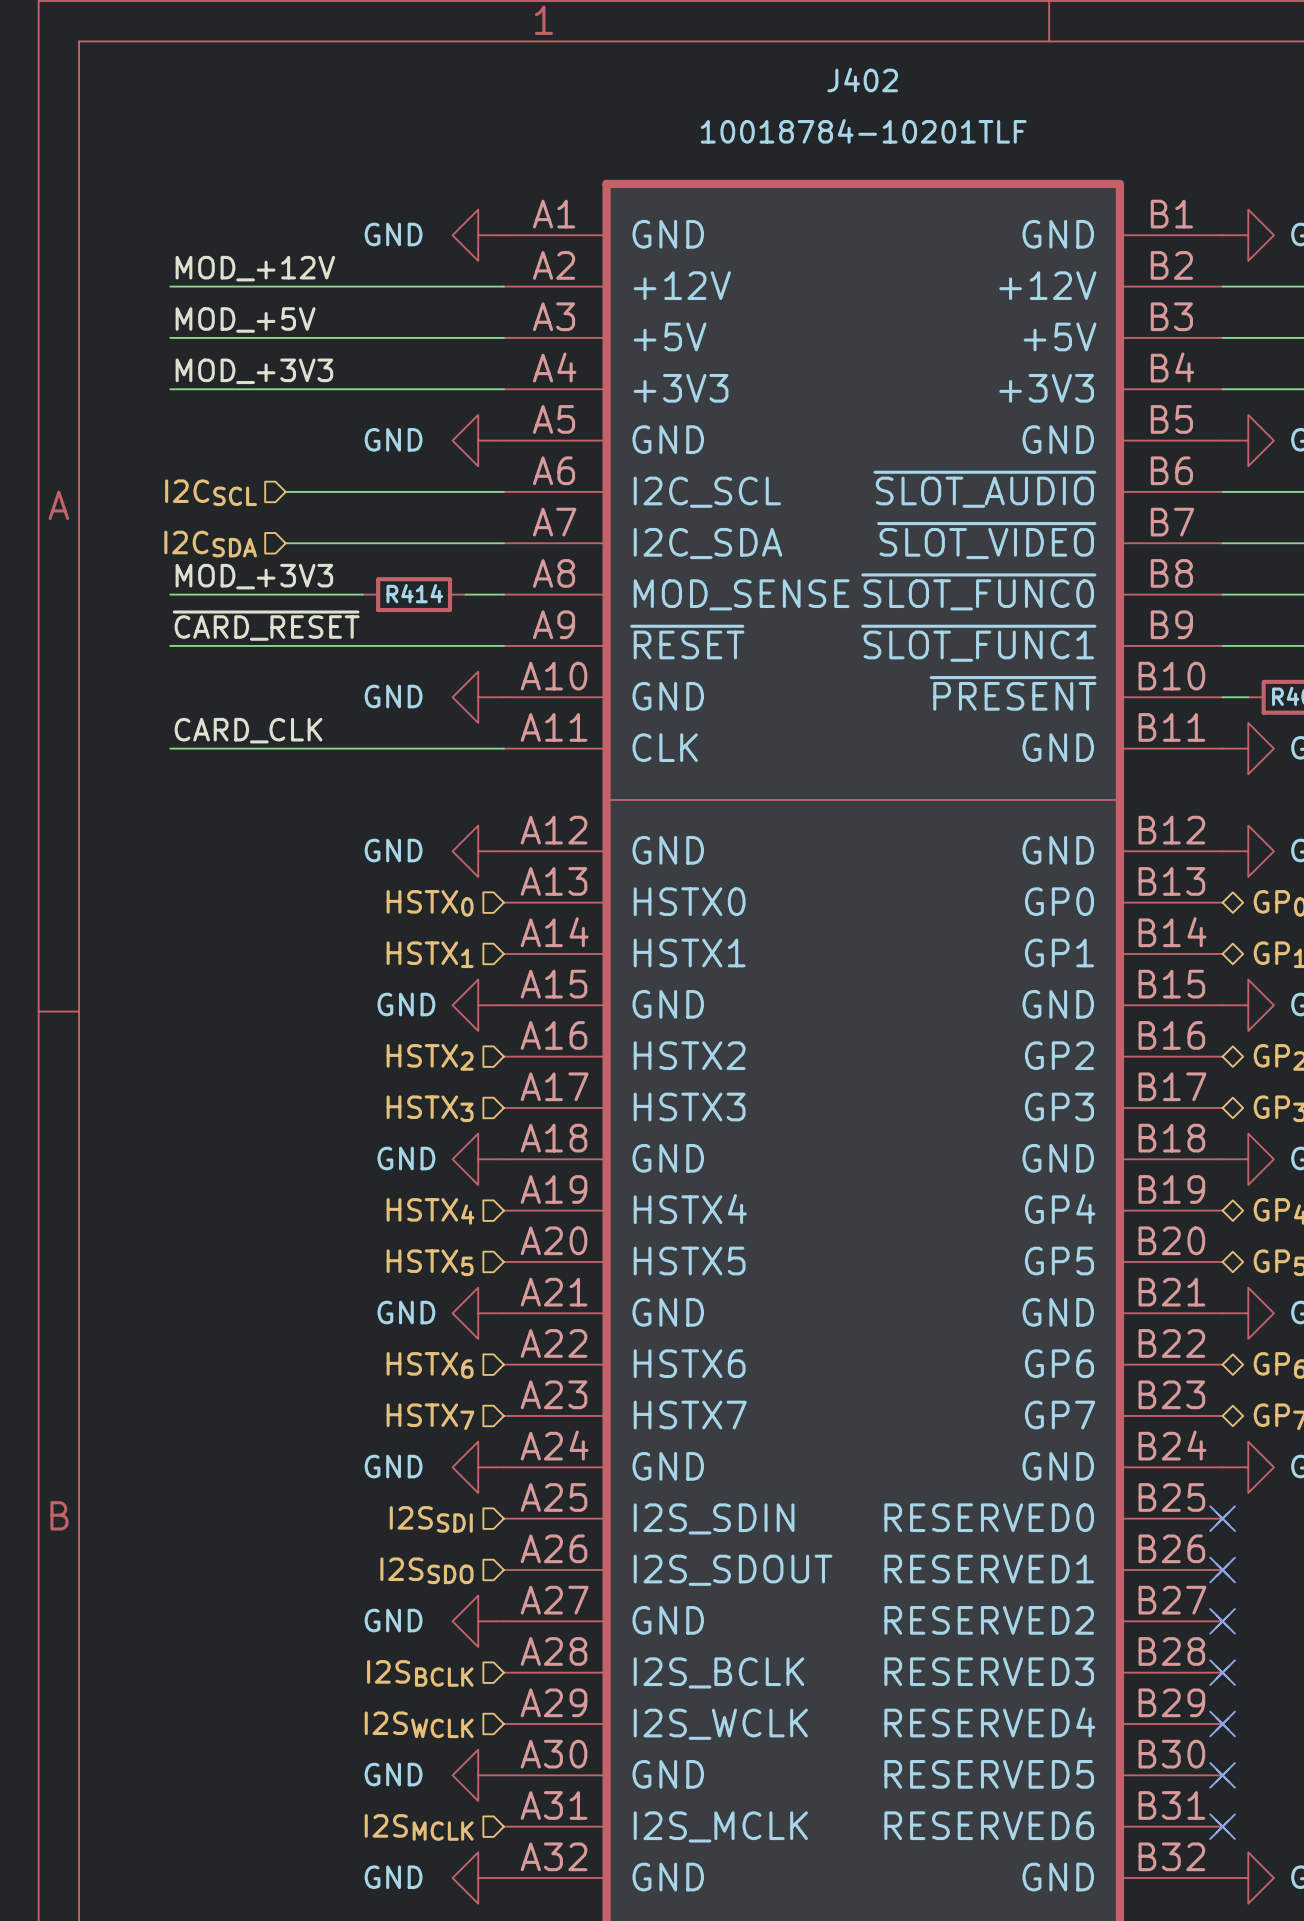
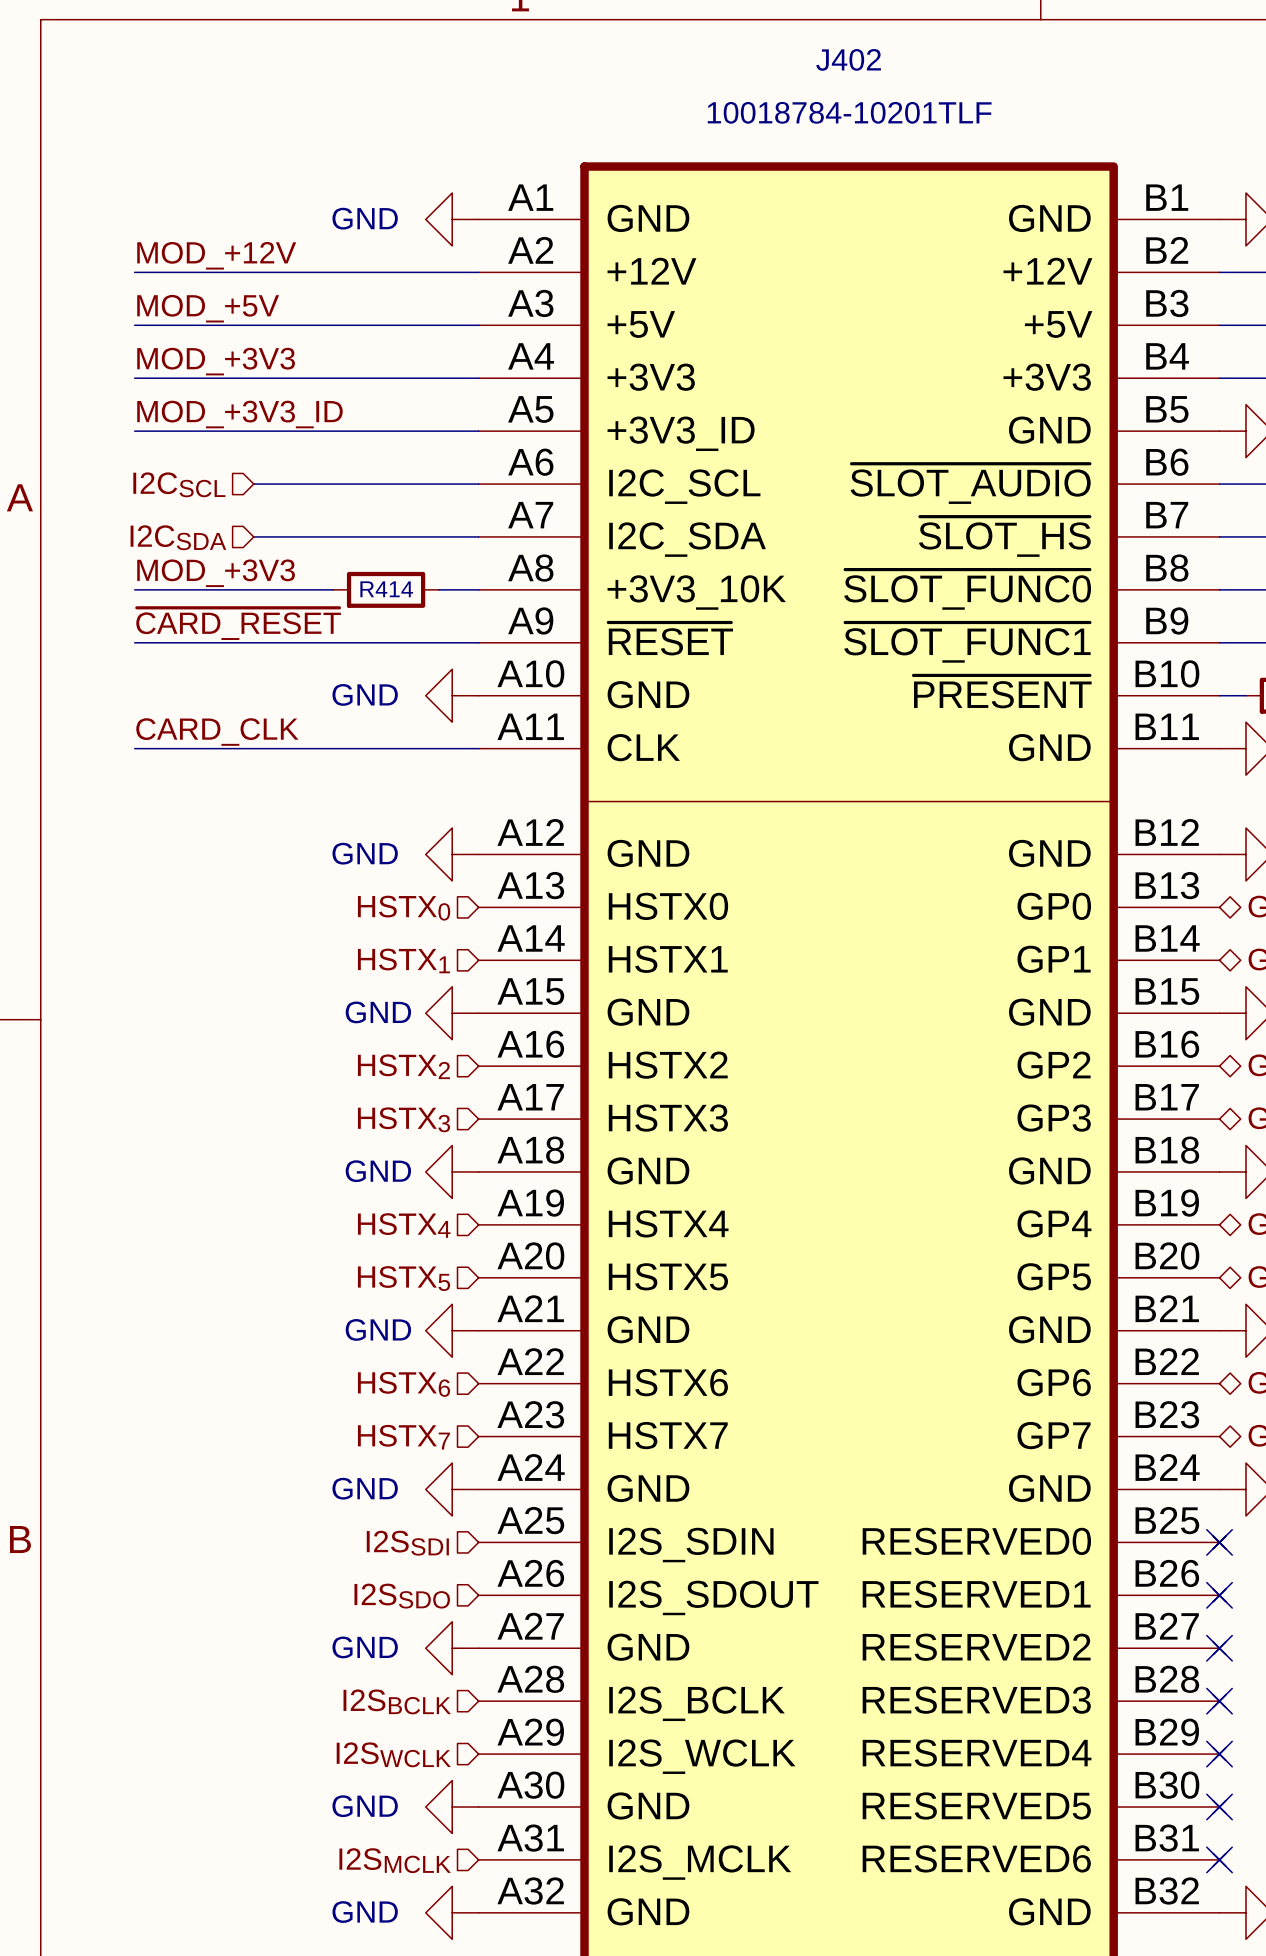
label: none -> MOD_+3V3_ID (239, 414)
J402 pin name: GND (668, 439) -> +3V3_ID (681, 433)
wire: none -> (134, 431) (478, 431)
power symbol: GND (478, 440) -> none
J402 pin name: ~{SLOT_VIDEO} (986, 540) -> ~{SLOT_HS} (1004, 536)
J402 pin name: MOD_SENSE (741, 594) -> +3V3_10K (696, 592)

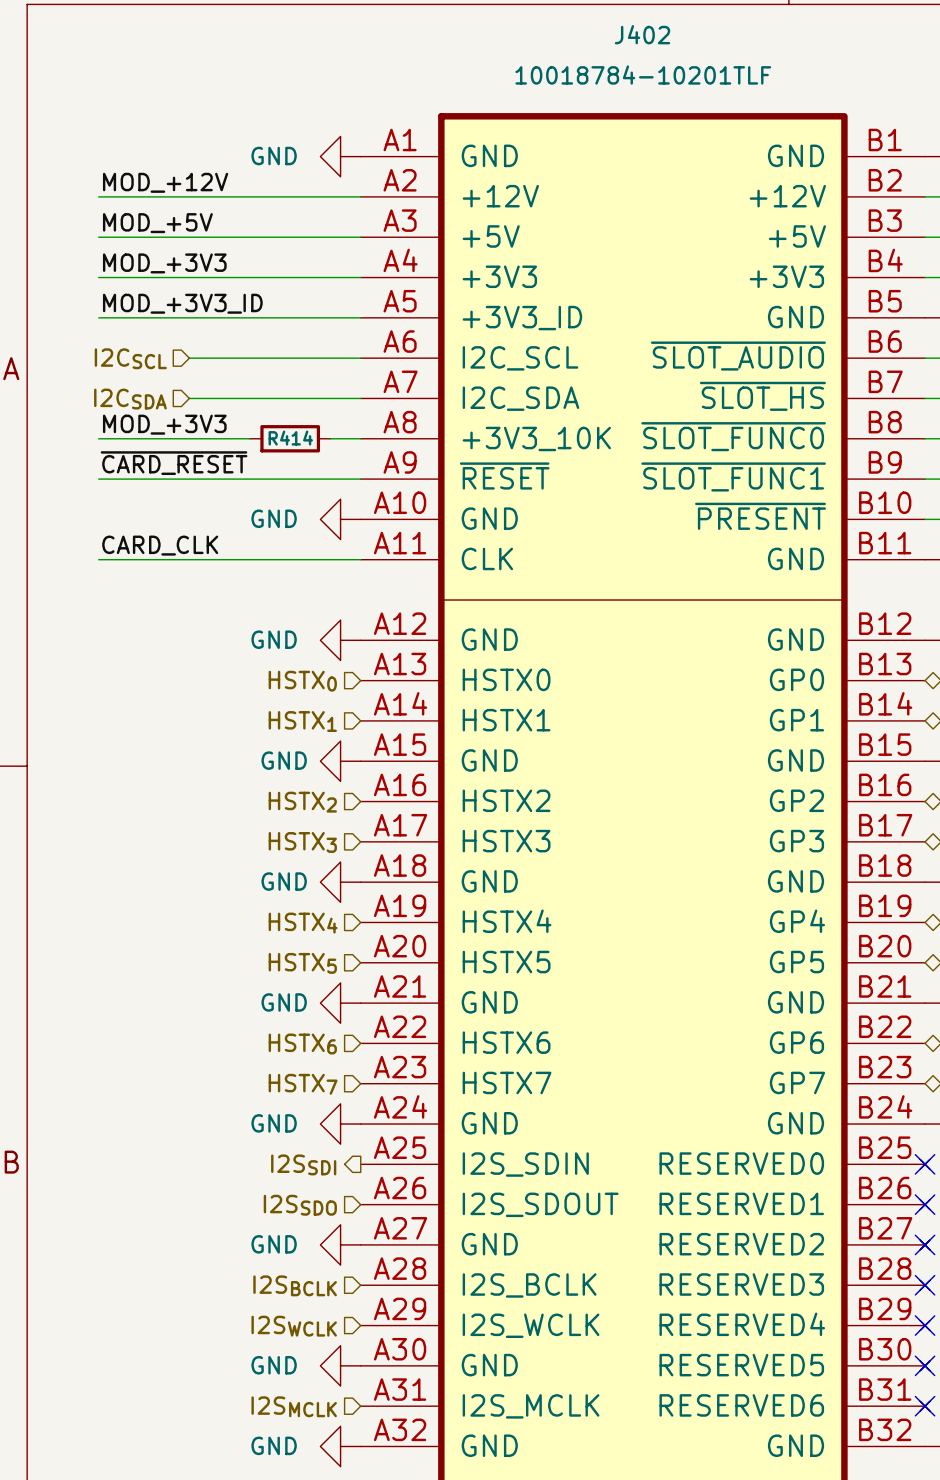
hierarchical label shape: input (407, 1543) -> output (303, 1164)

